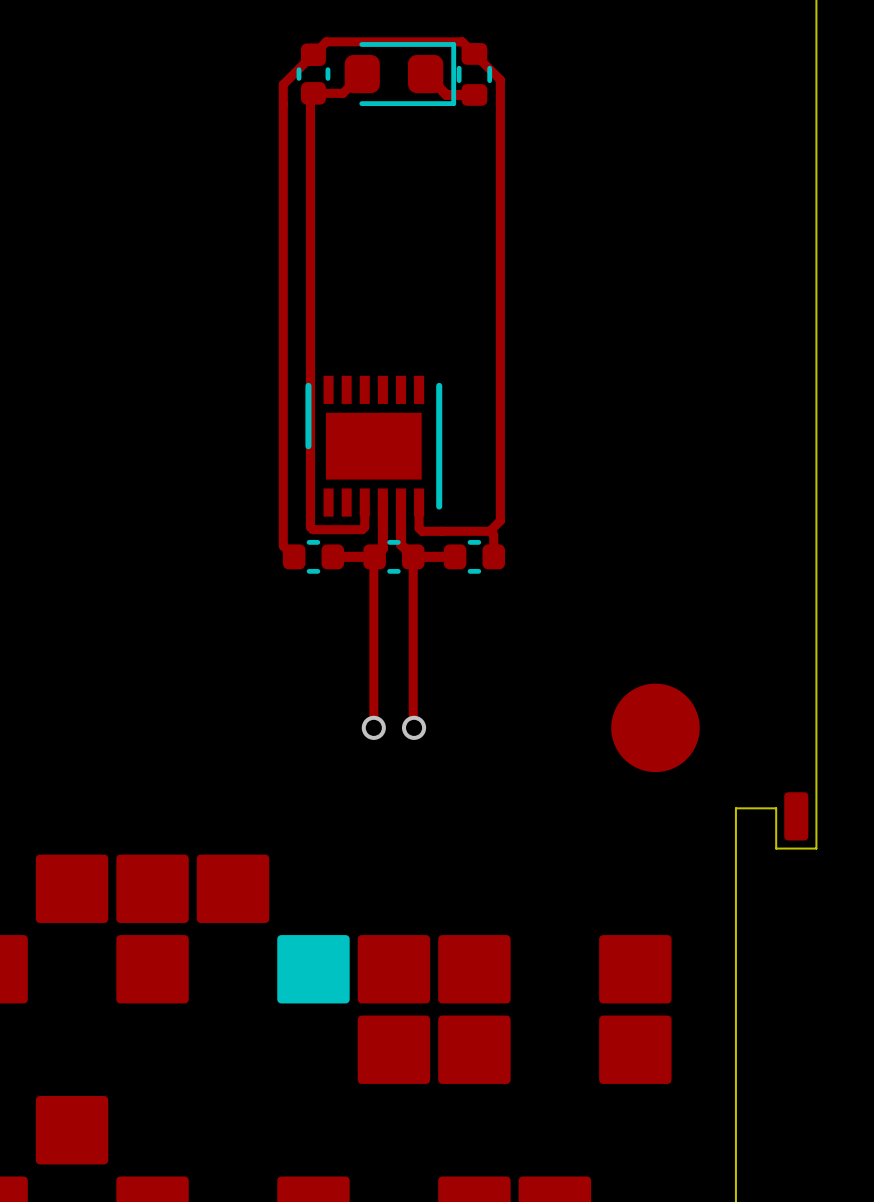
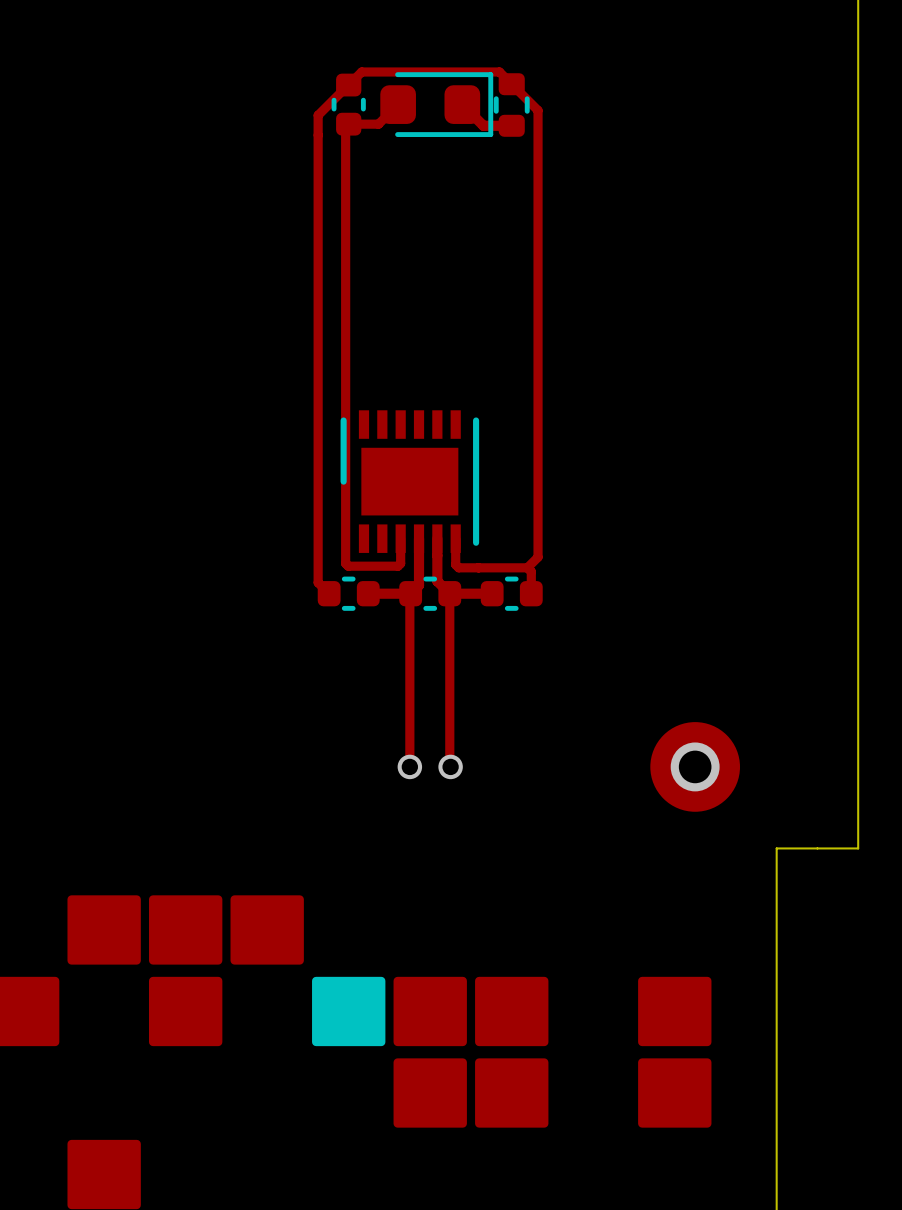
via: none -> (695, 766)
drawing: [784, 792, 809, 841] -> none
board edge: (776, 808) (776, 848) (816, 848) (816, 808) -> (817, 848) (858, 848)

